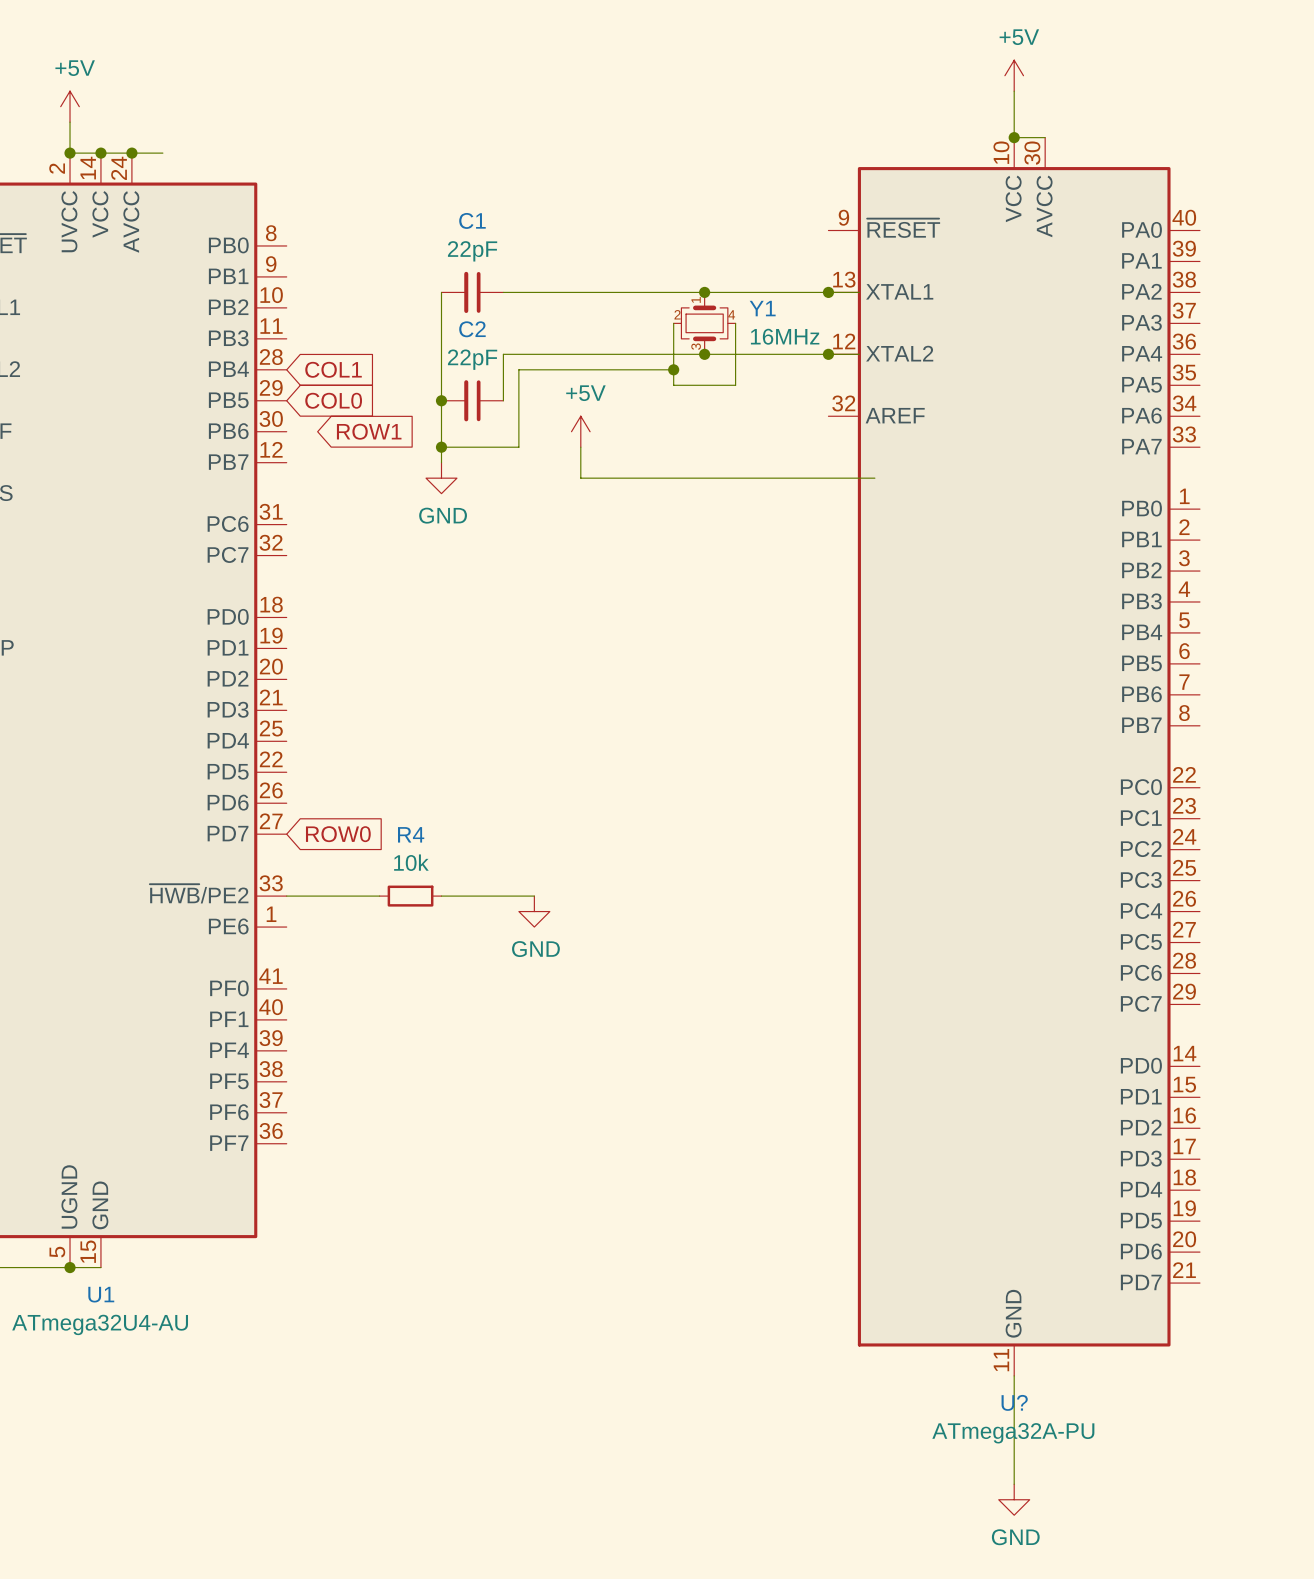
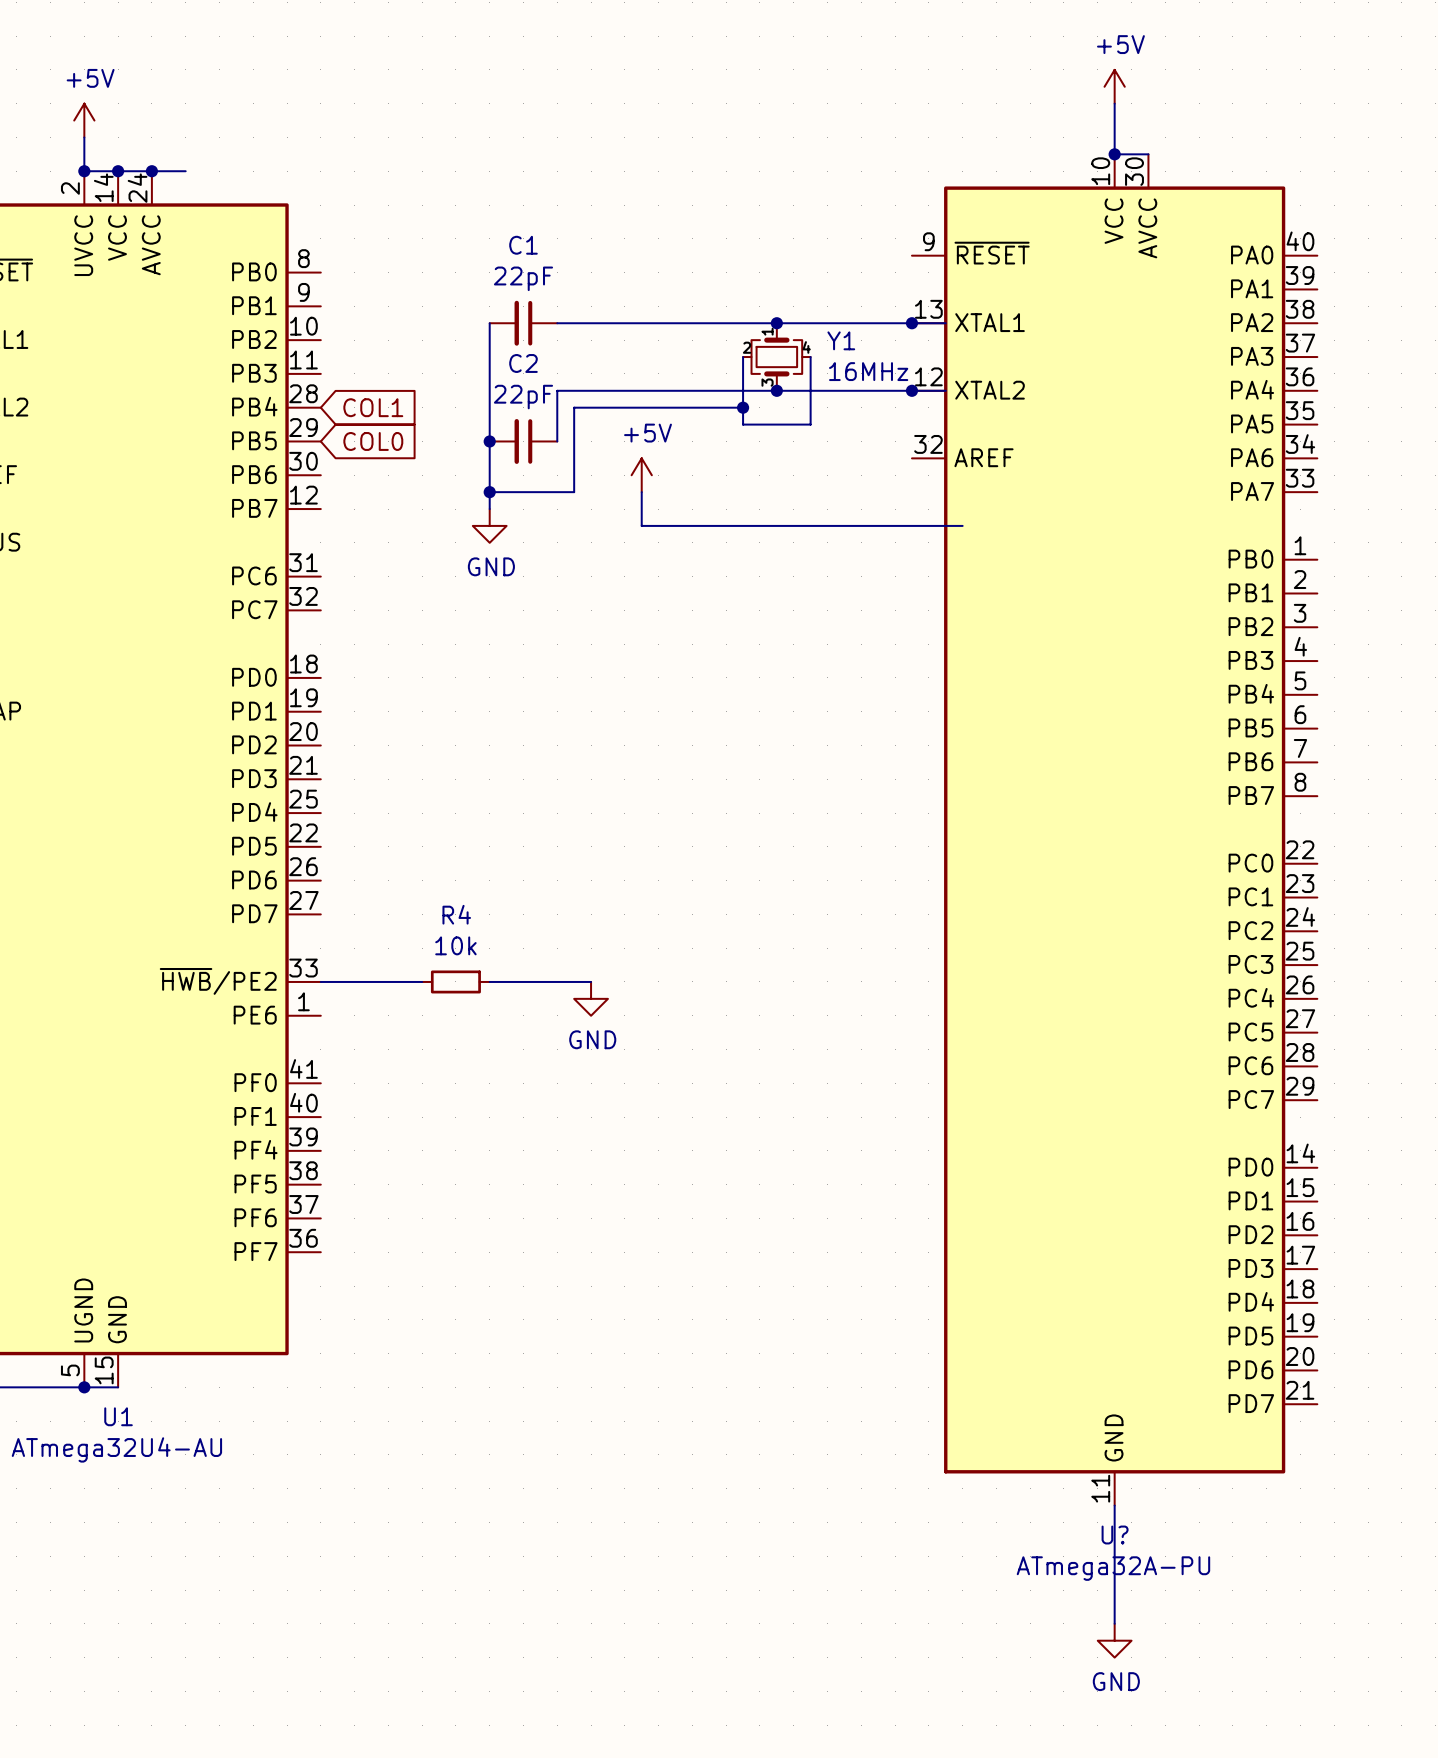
global label: ROW1 (369, 431) -> none
global label: ROW0 (338, 834) -> none

